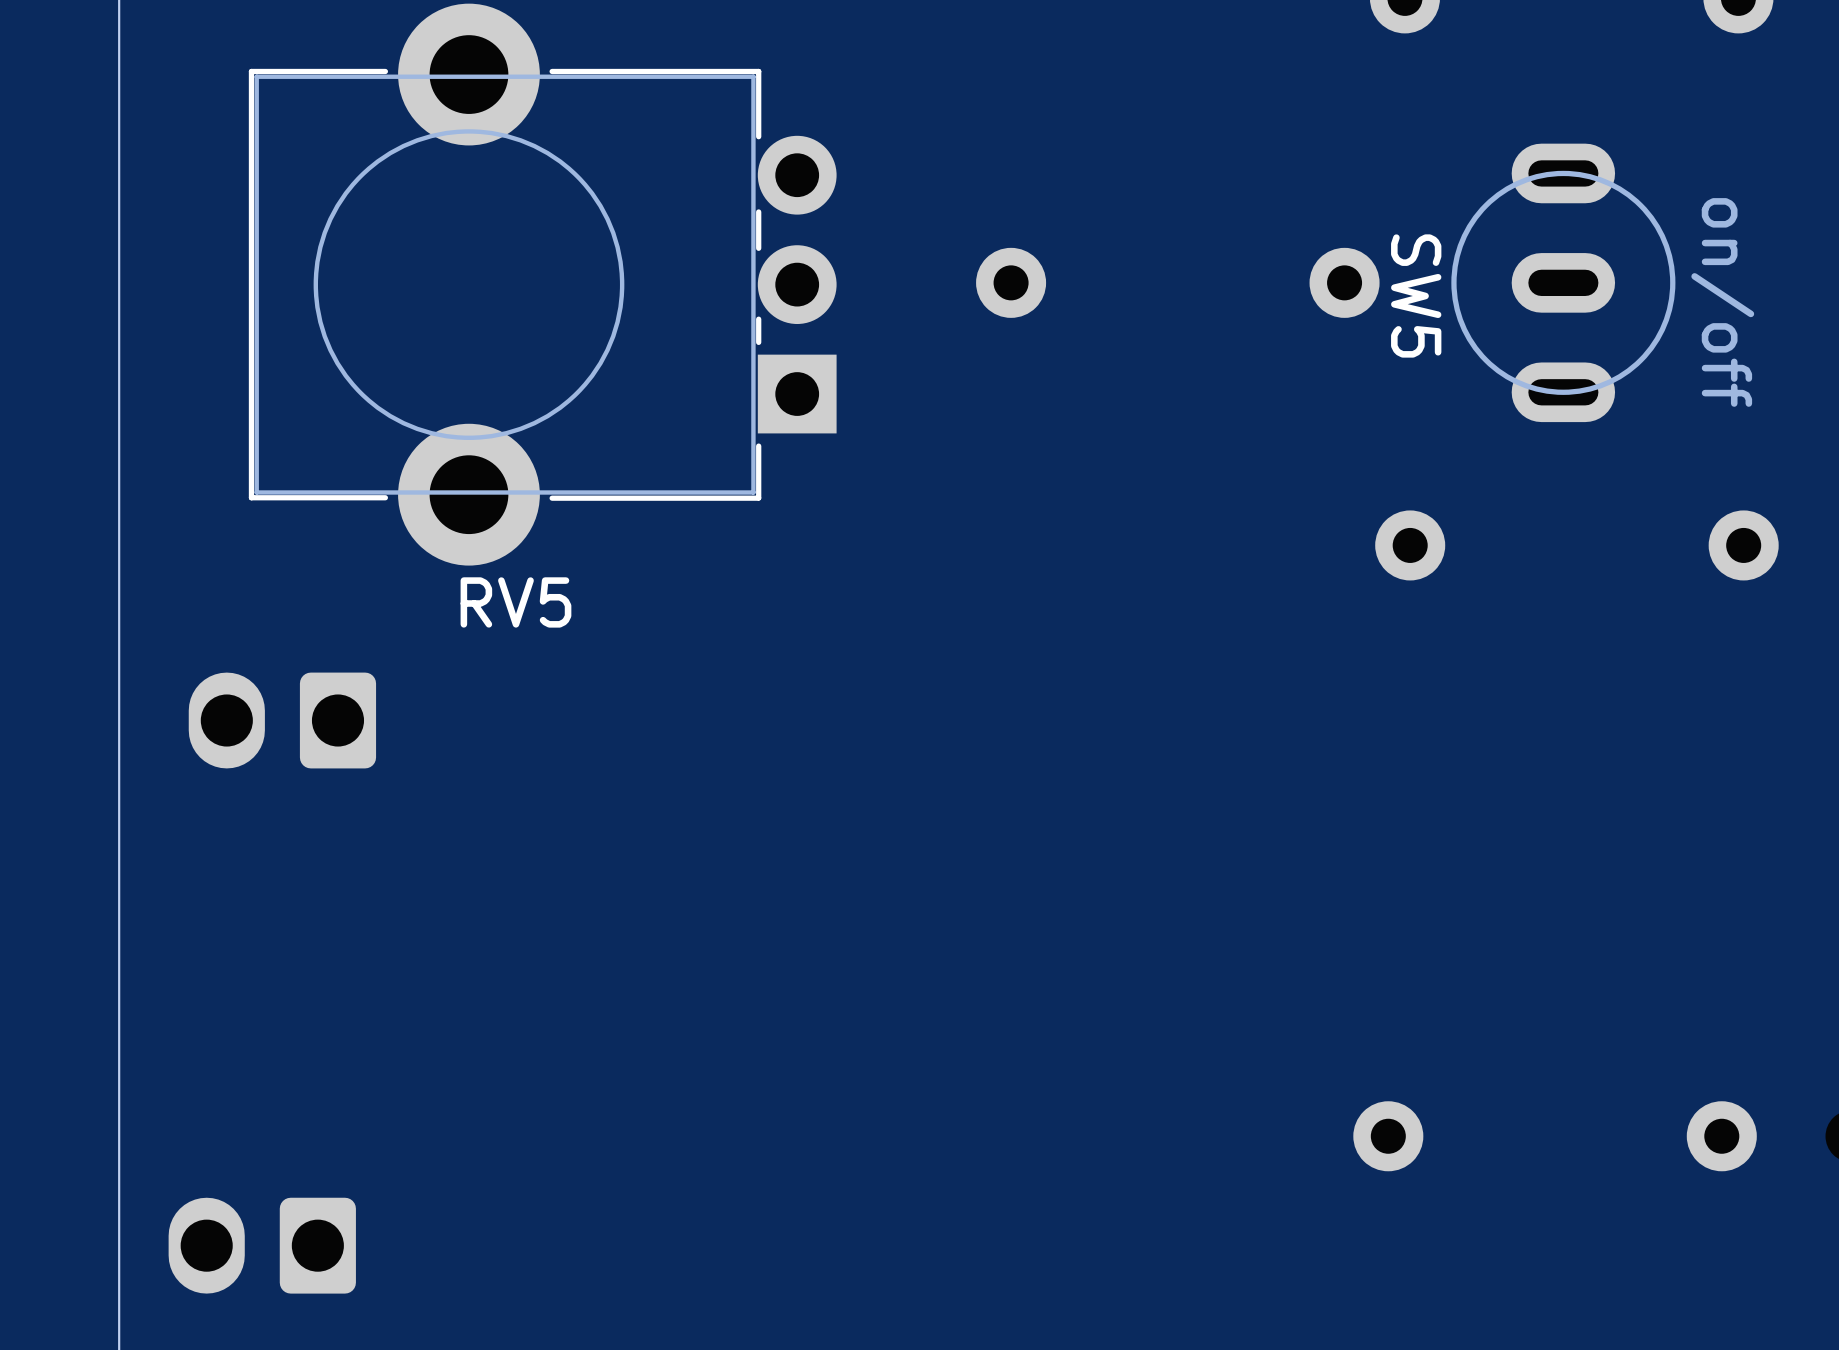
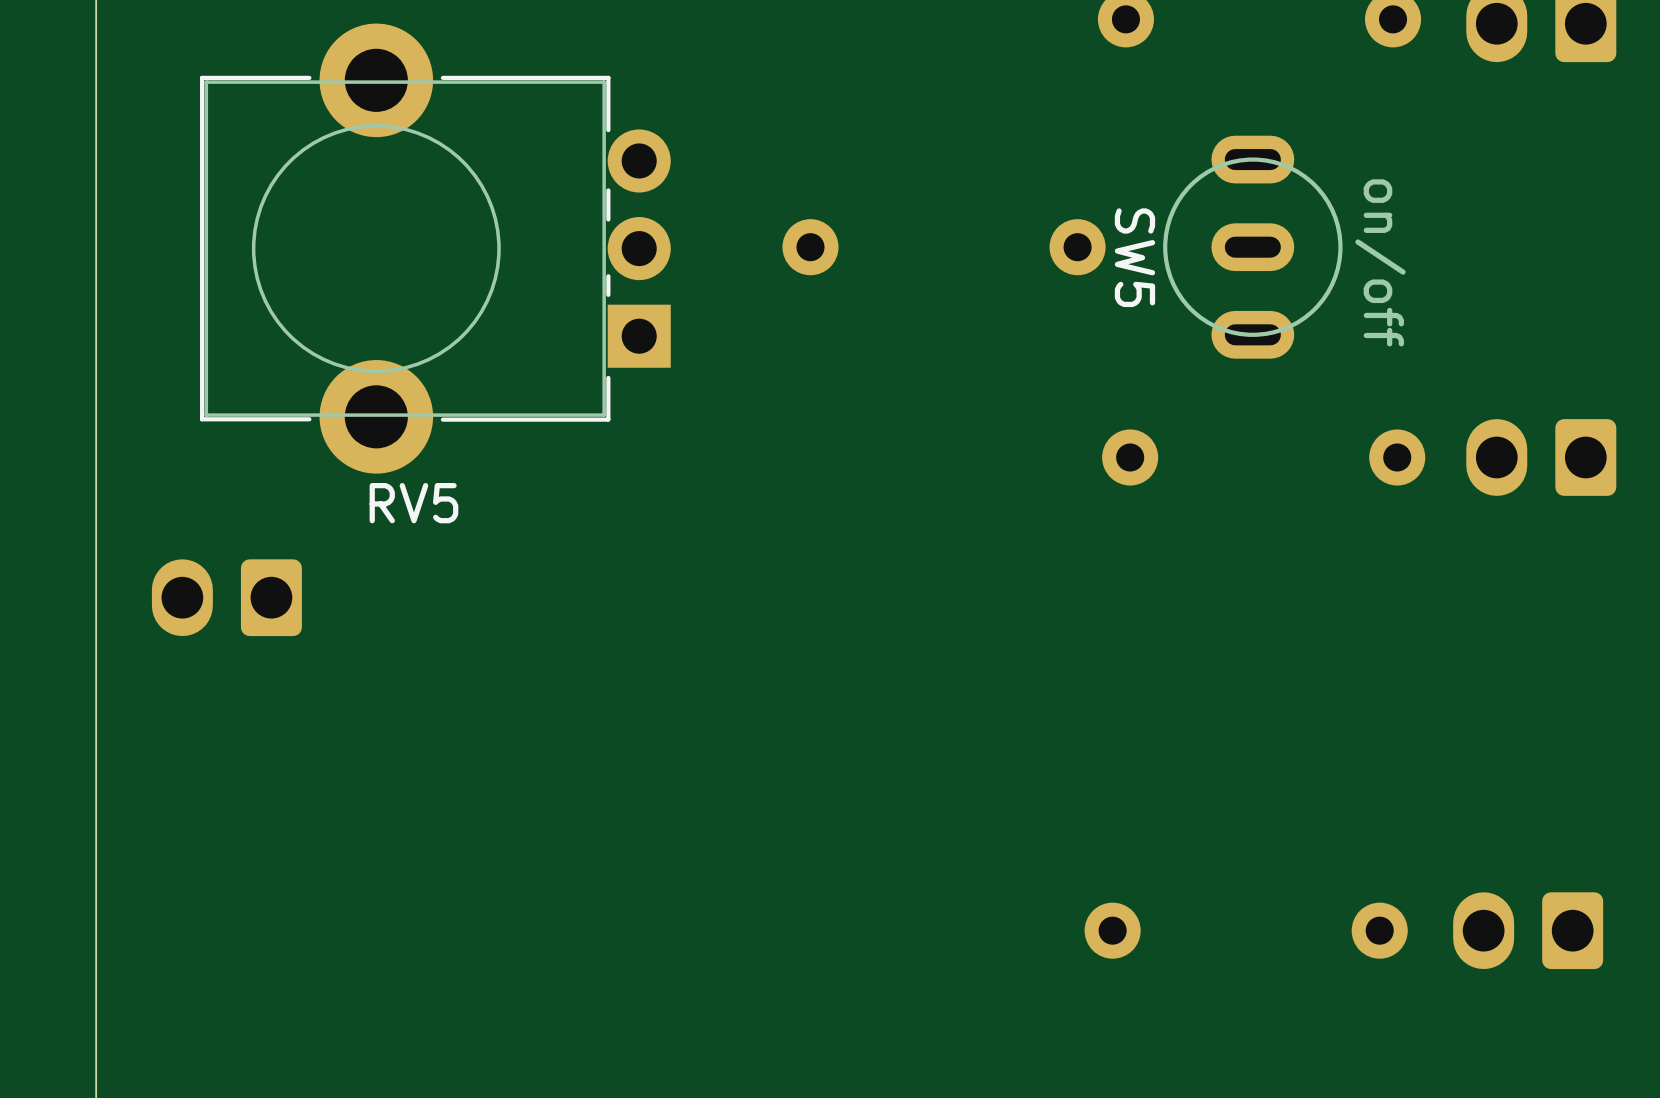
part: (262, 1245) -> none

